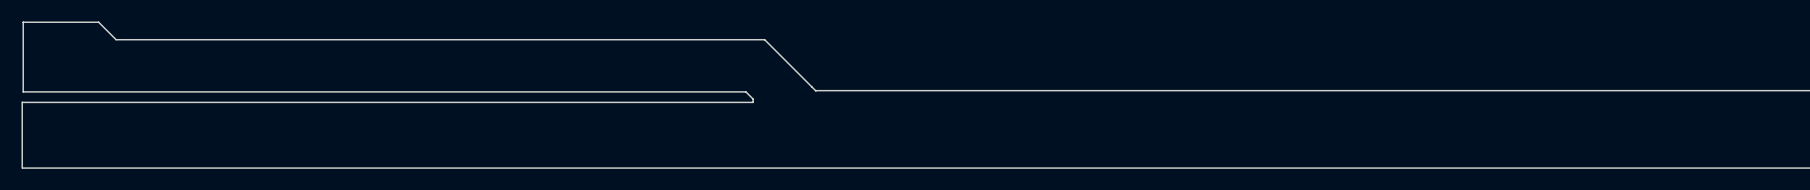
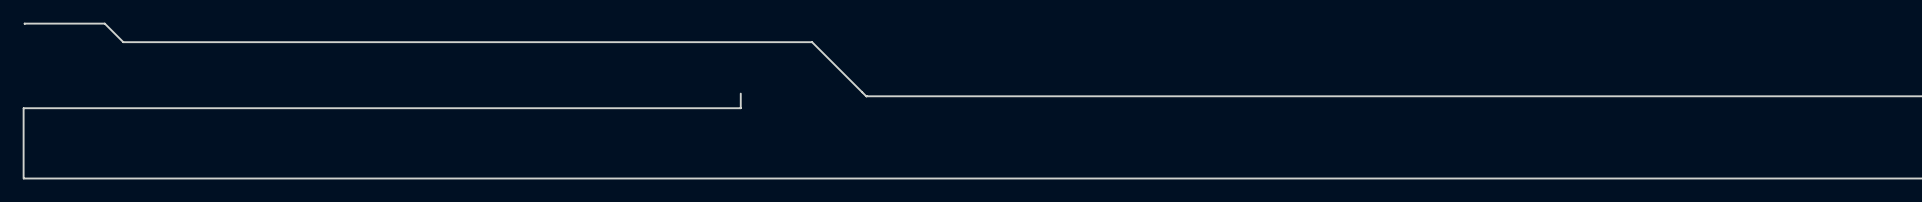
board edge: (23, 22) (23, 91) (745, 91) (753, 99) (753, 102) (22, 102) -> none
board edge: none -> (740, 93) (740, 108) (23, 108)

